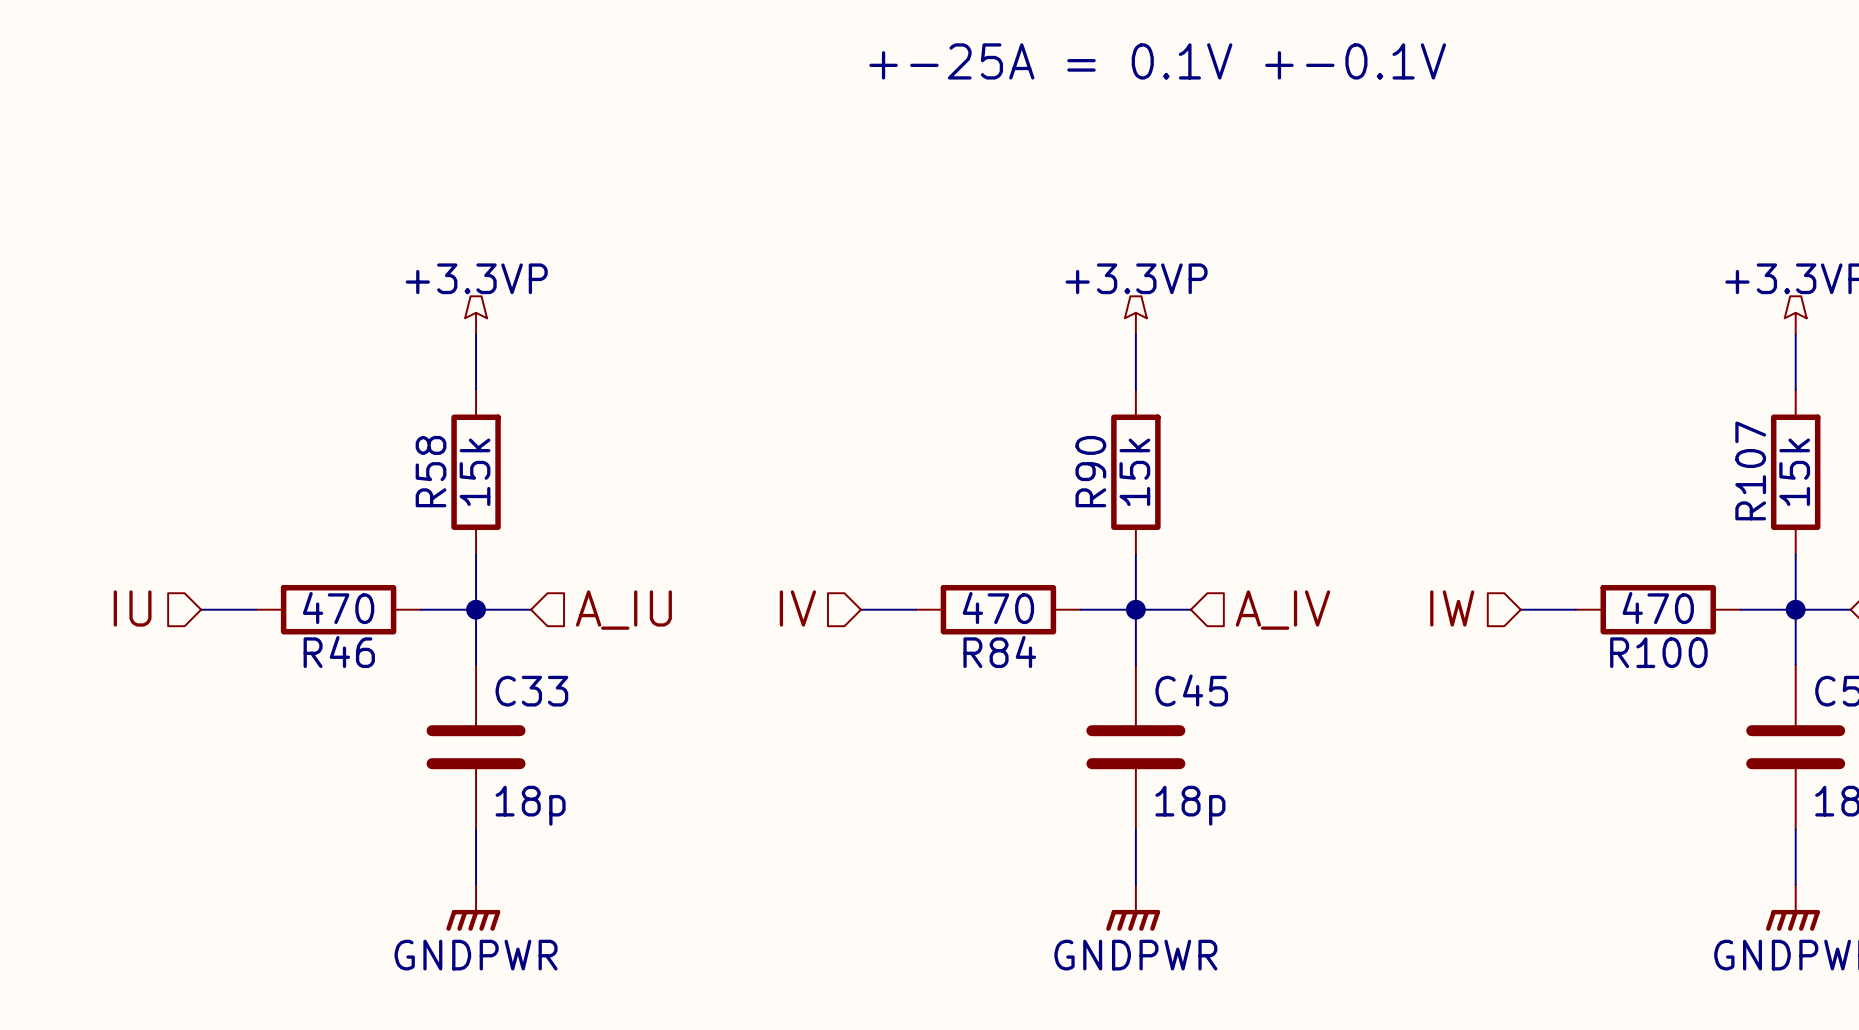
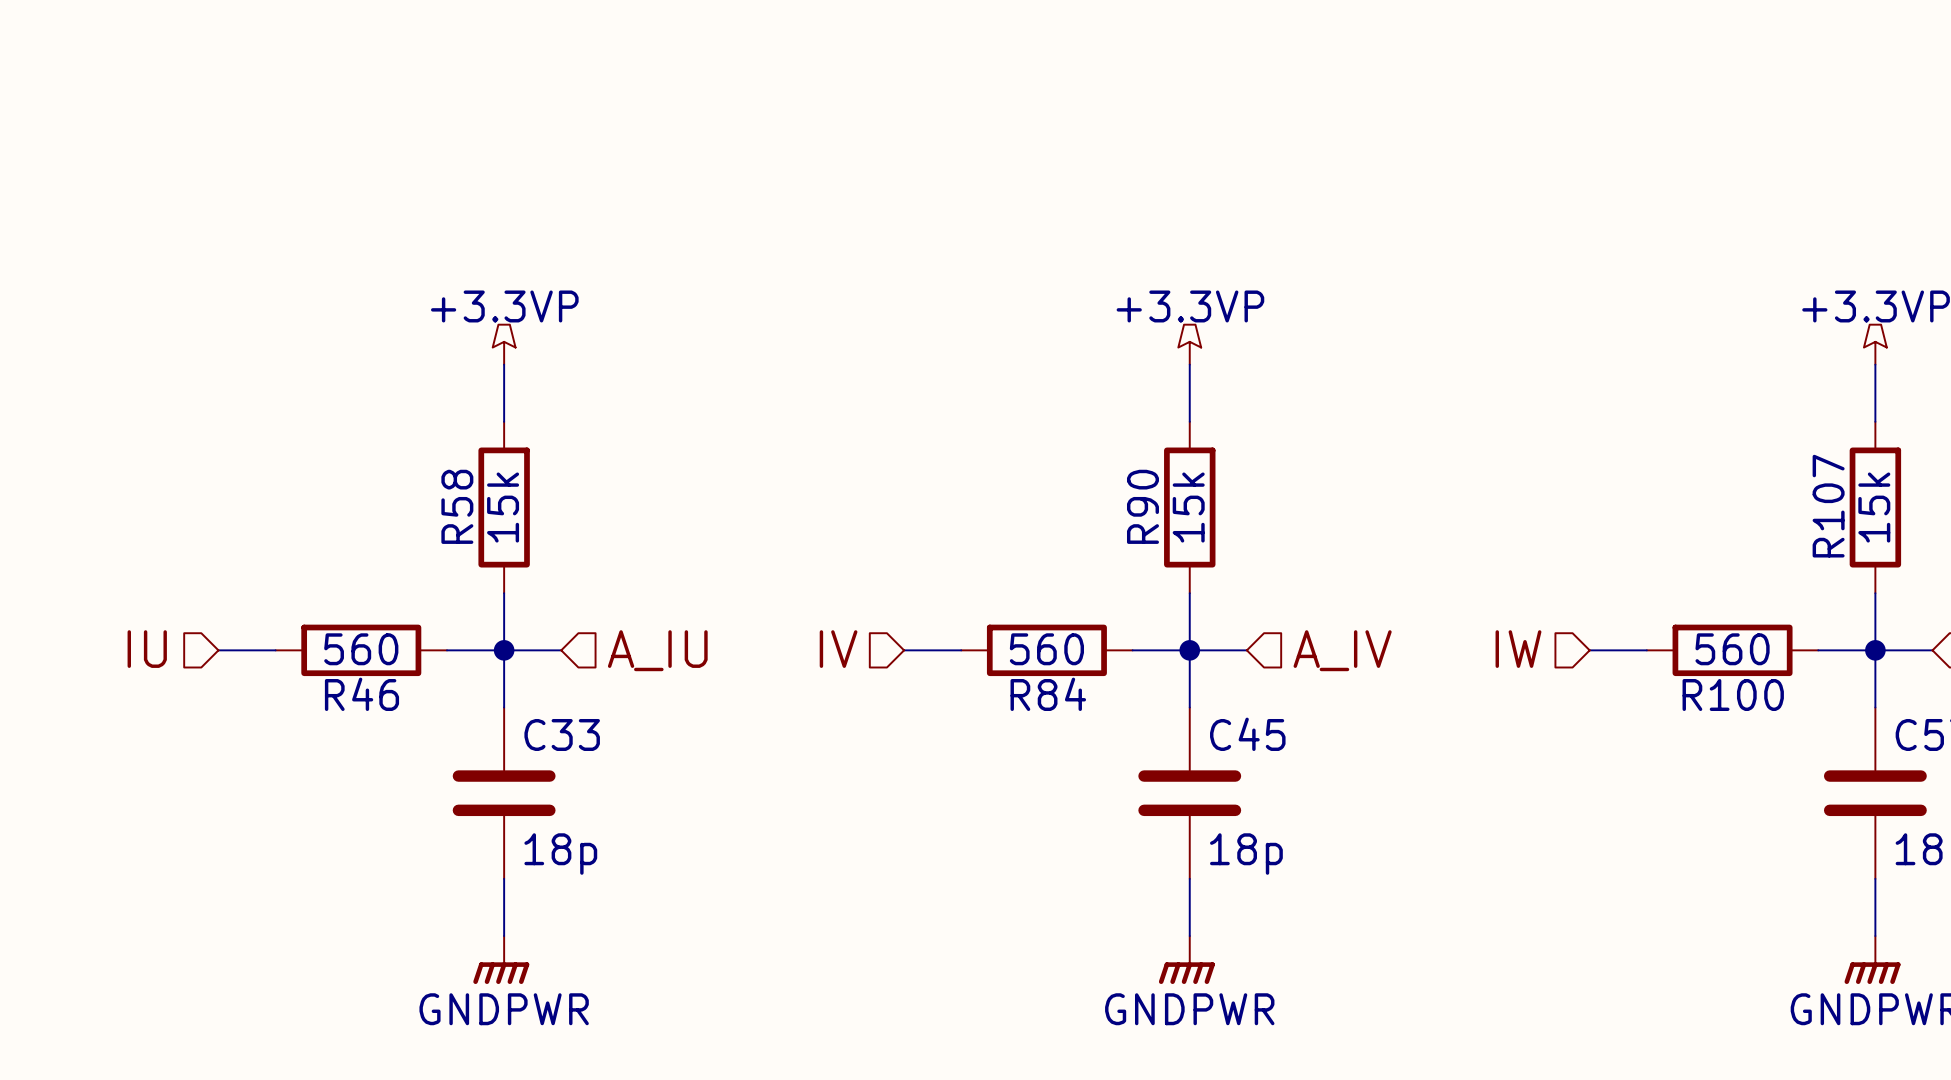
text: +-25A = 0.1V +-0.1V (1157, 61) -> none
R46 value: 470 (338, 608) -> 560 (361, 649)
R84 value: 470 (998, 608) -> 560 (1046, 649)
R100 value: 470 (1658, 608) -> 560 (1732, 649)

